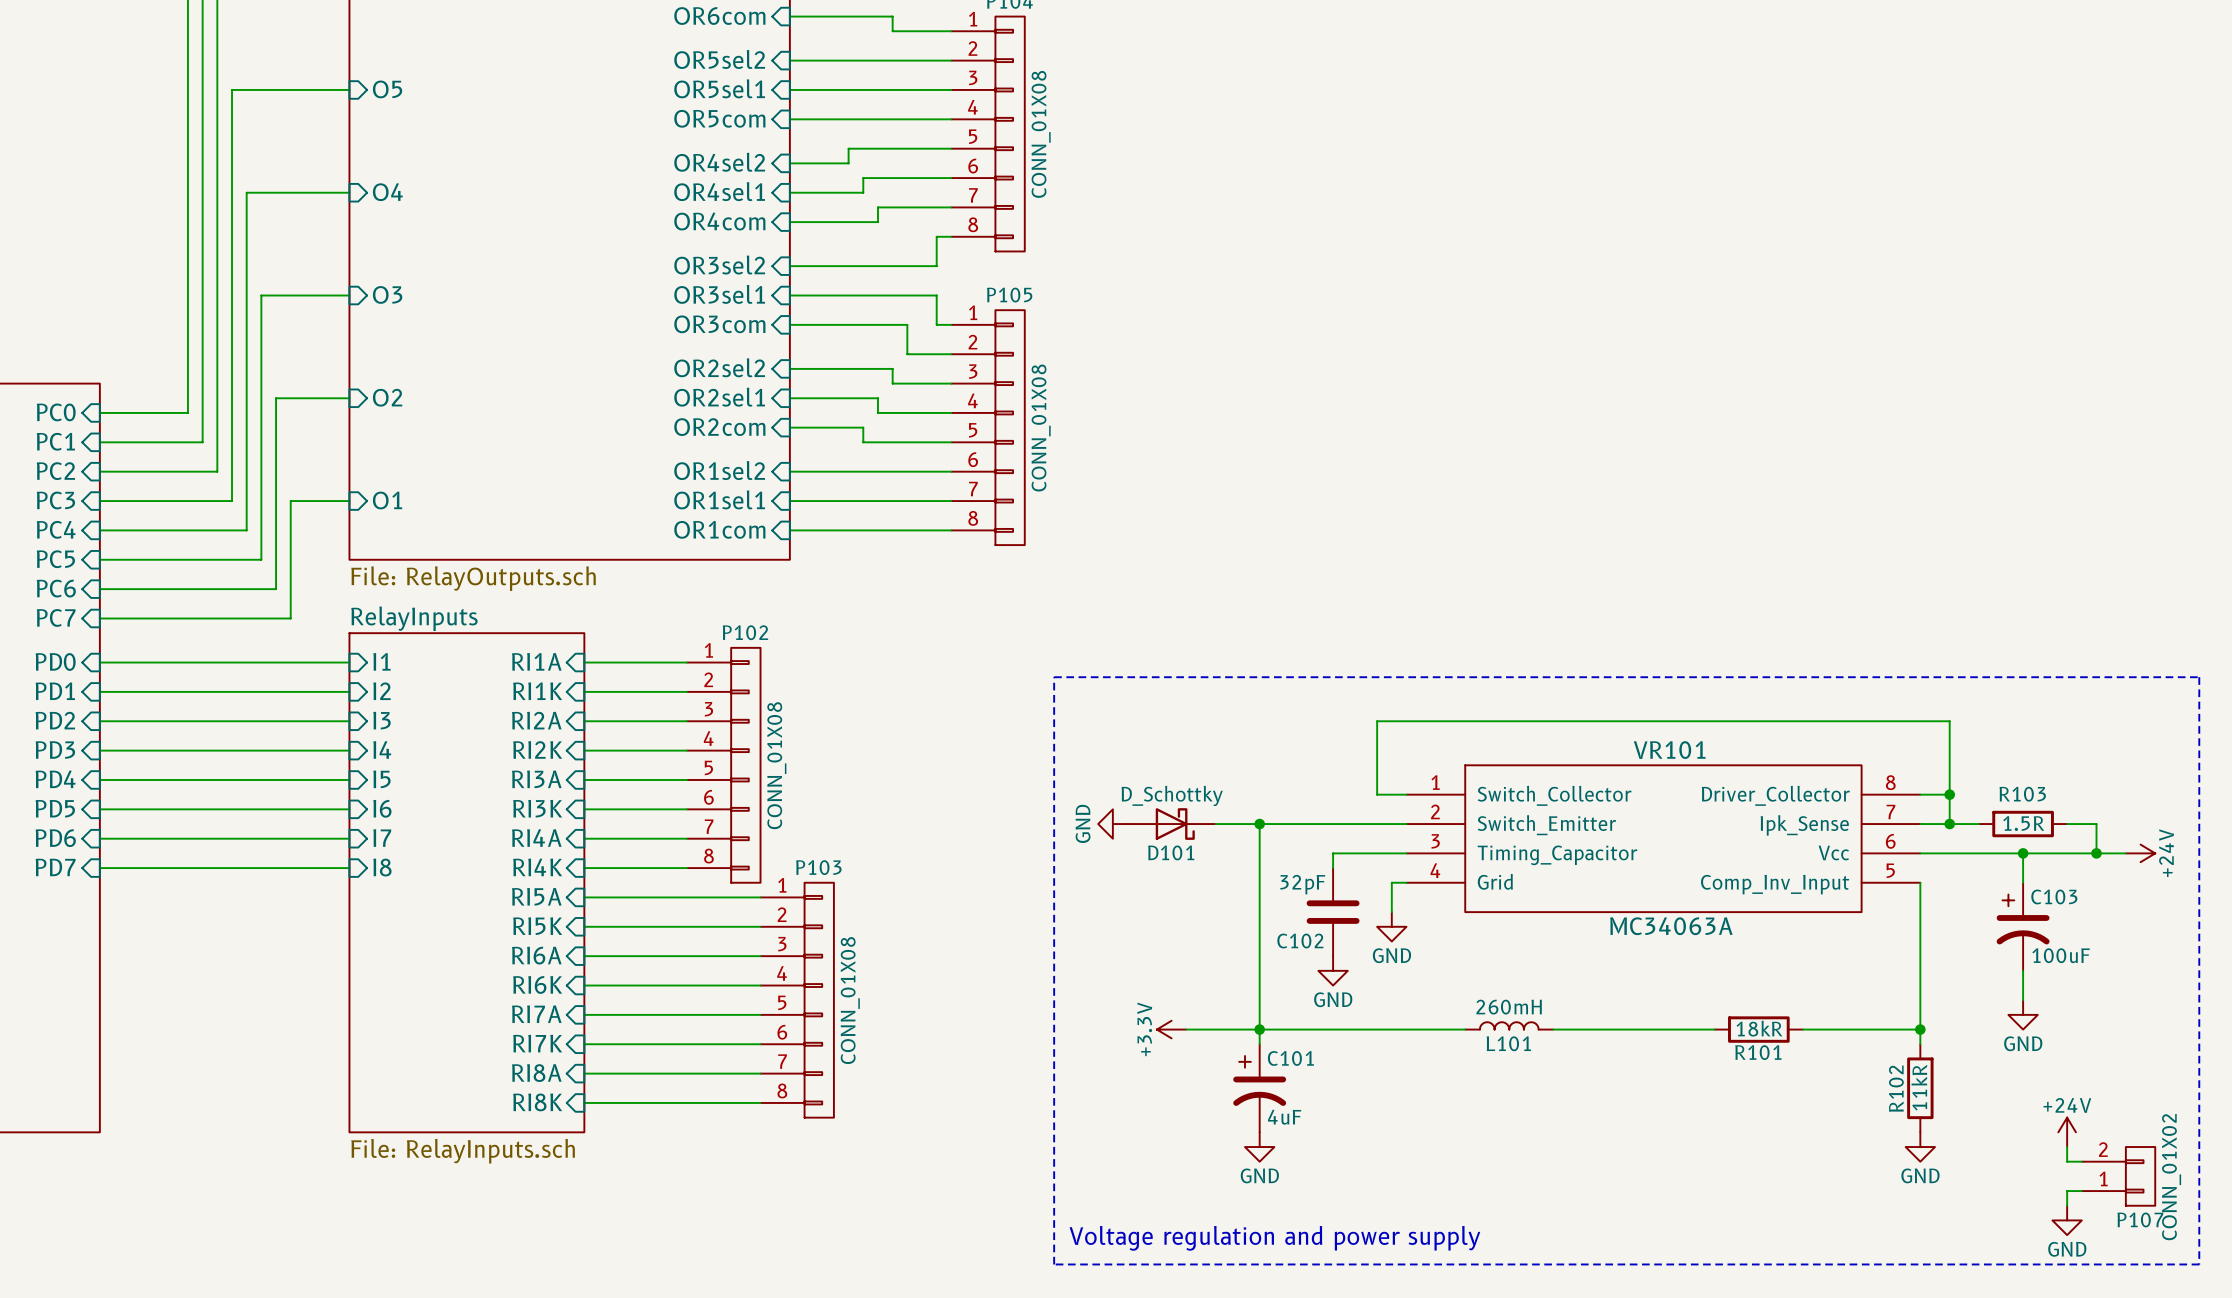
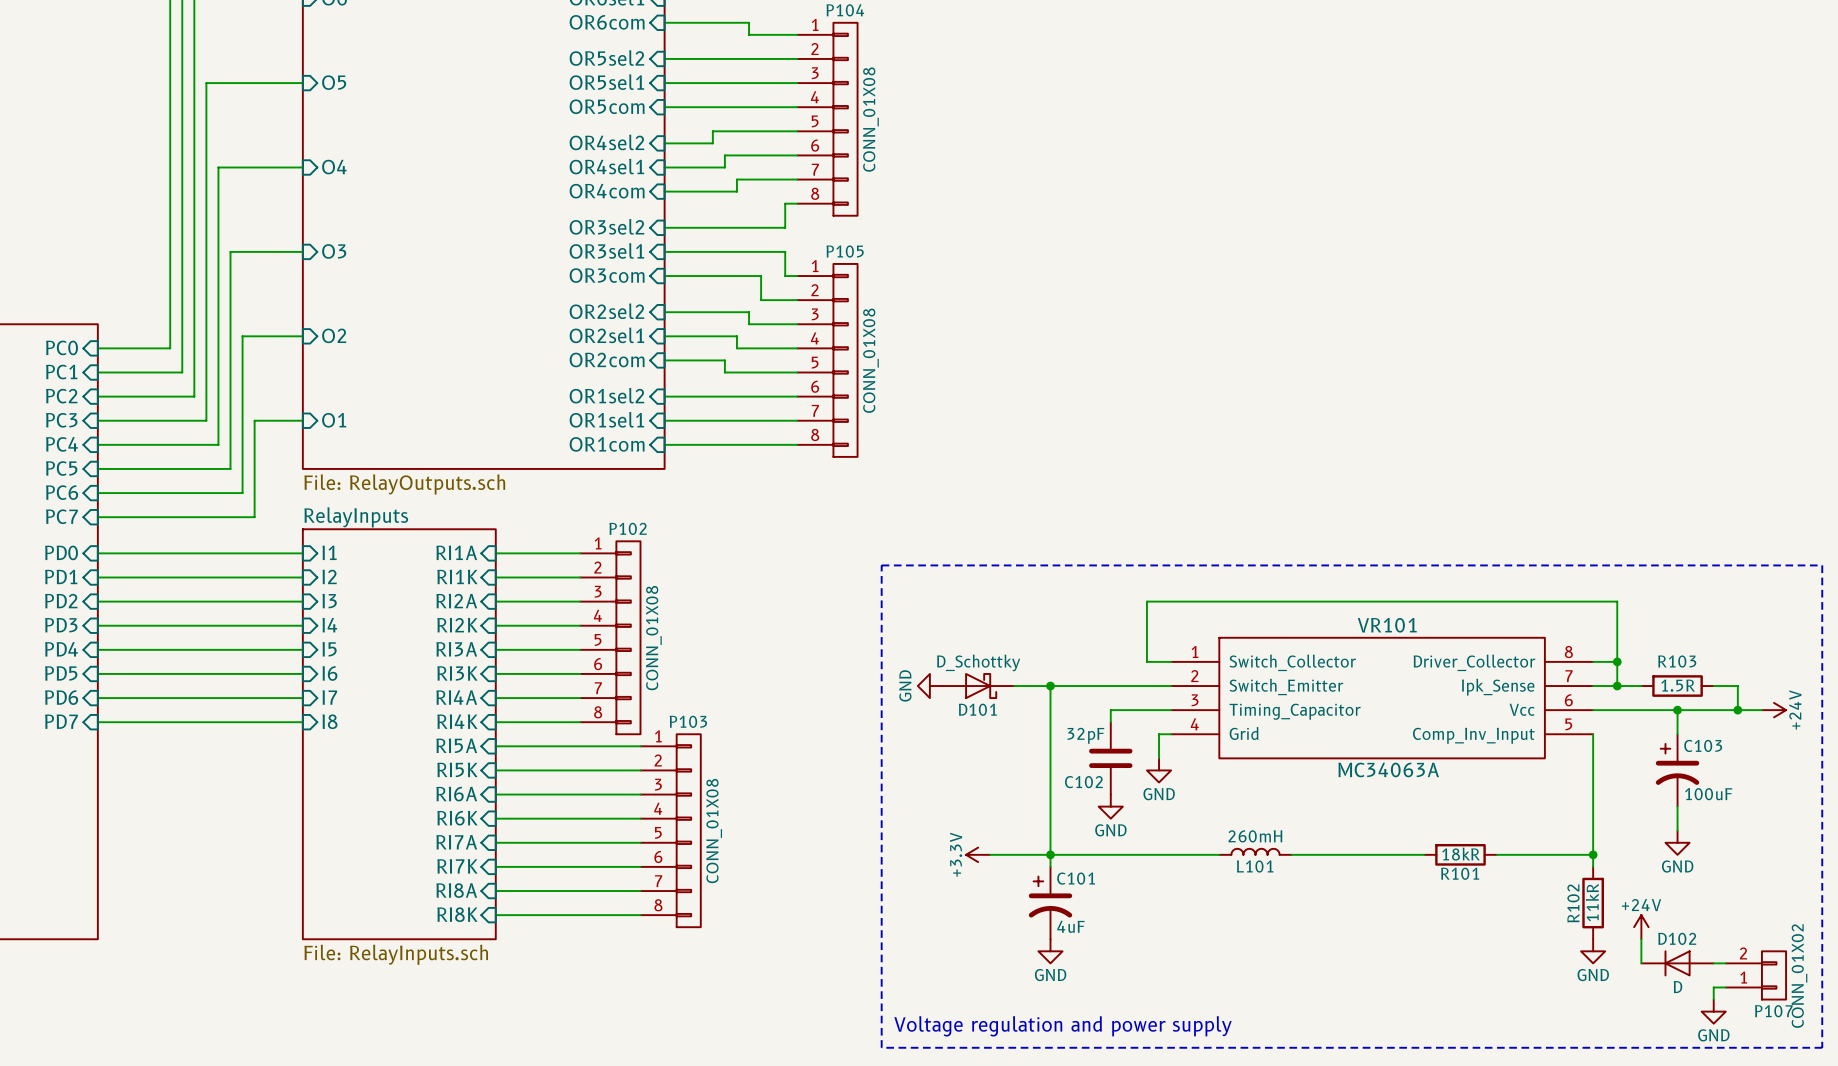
wire: none -> (1641, 939) (1641, 963)
power symbol position: +24V (2067, 1132) -> +24V (1641, 927)
wire: (2067, 1147) (2067, 1161) -> none
D102: none -> D (1677, 963)

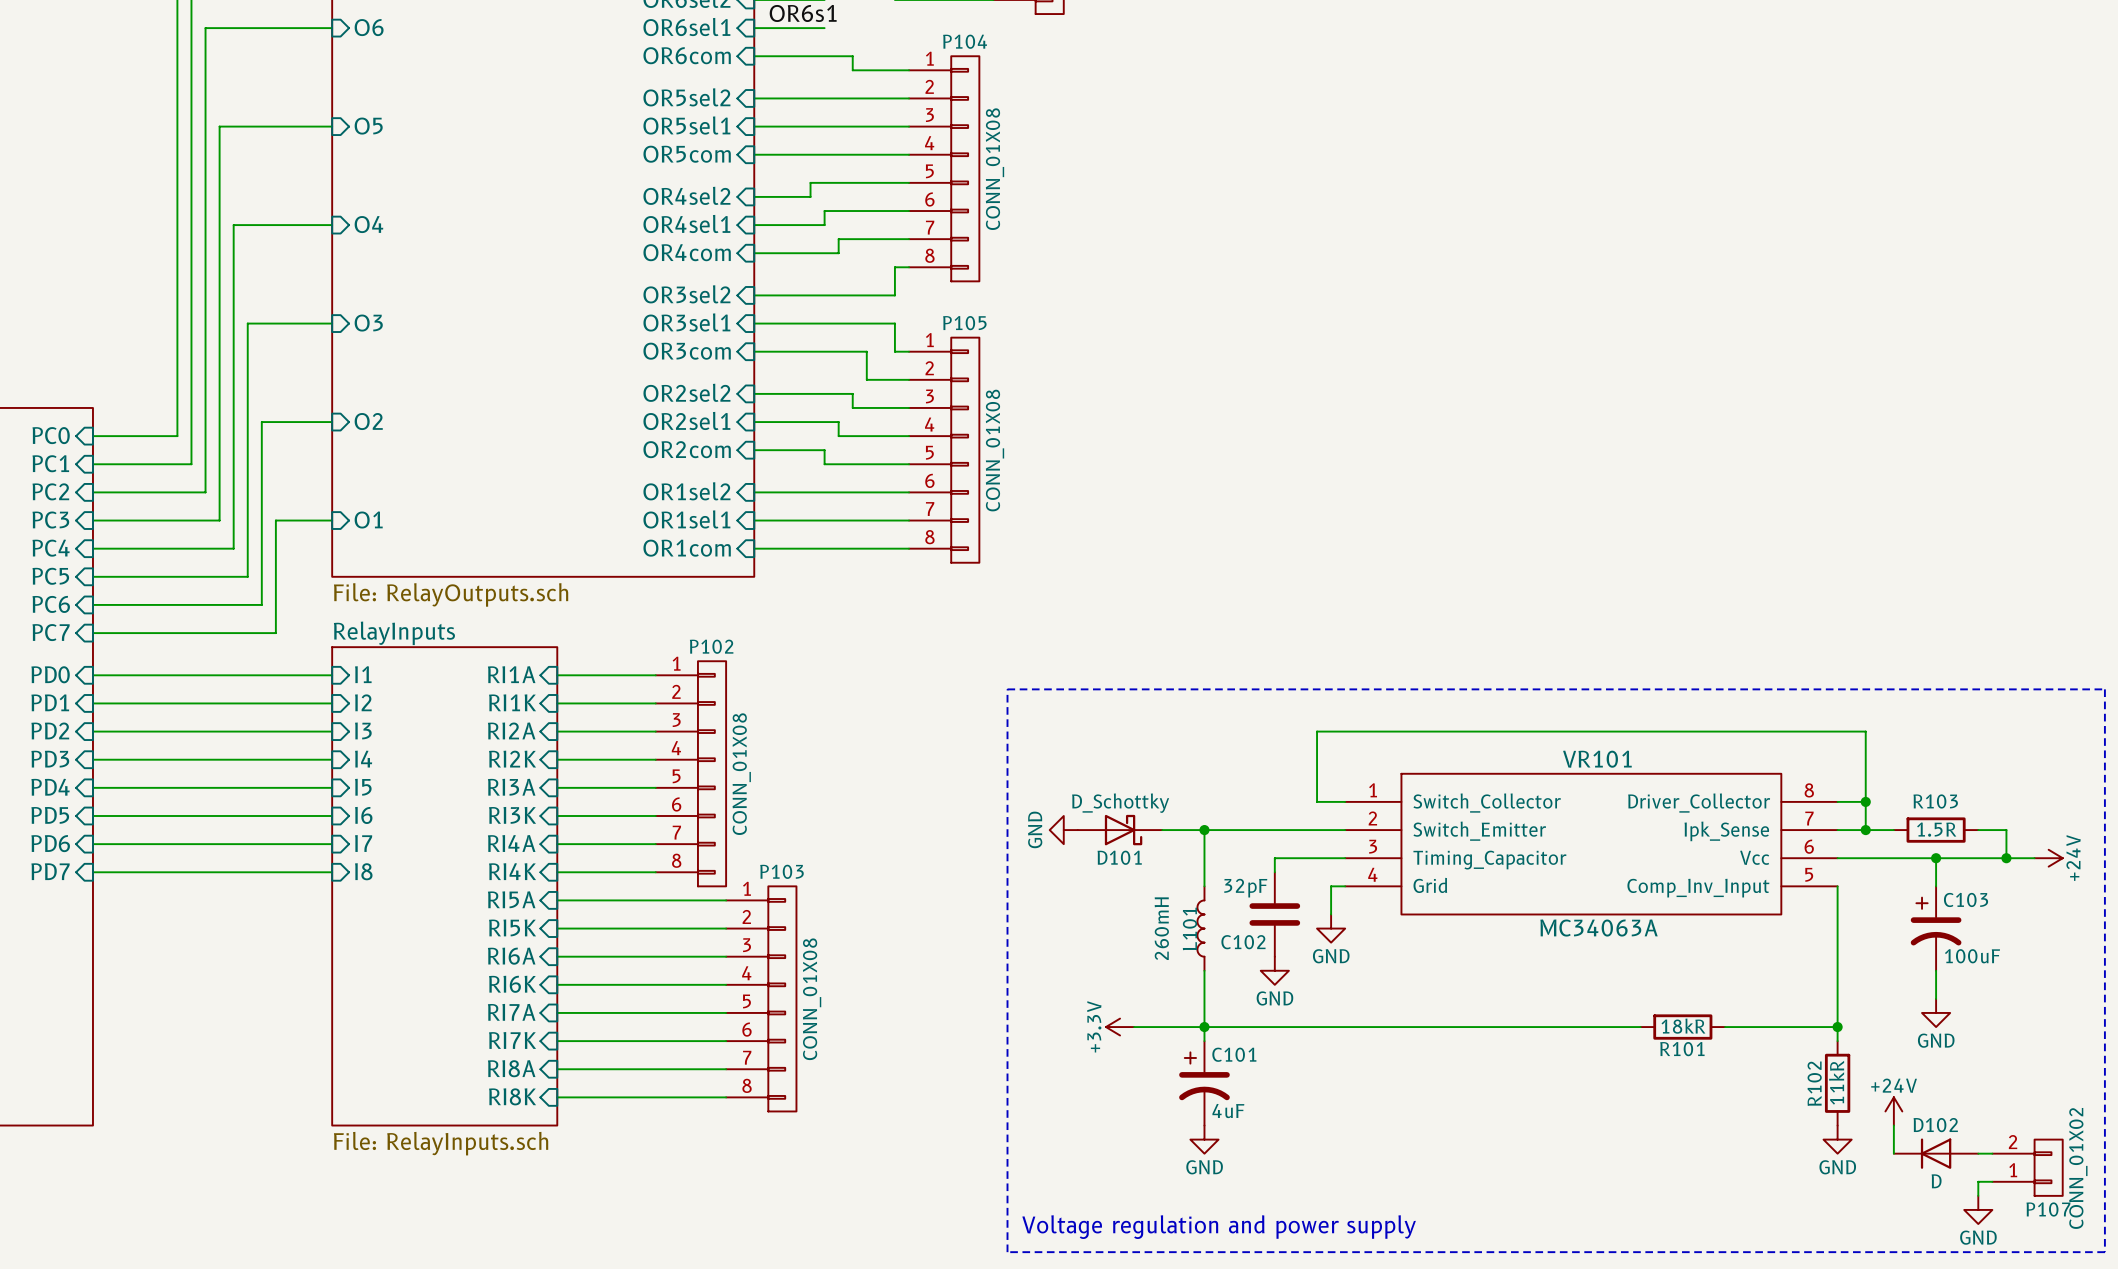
wire: (1050, 734) (1050, 806) -> none
L101 rotation: 0° (1255, 851) -> 90° counterclockwise (1200, 928)
L101 position: (1255, 851) -> (1200, 928)
wire: none -> (1401, 1027) (1485, 1027)

